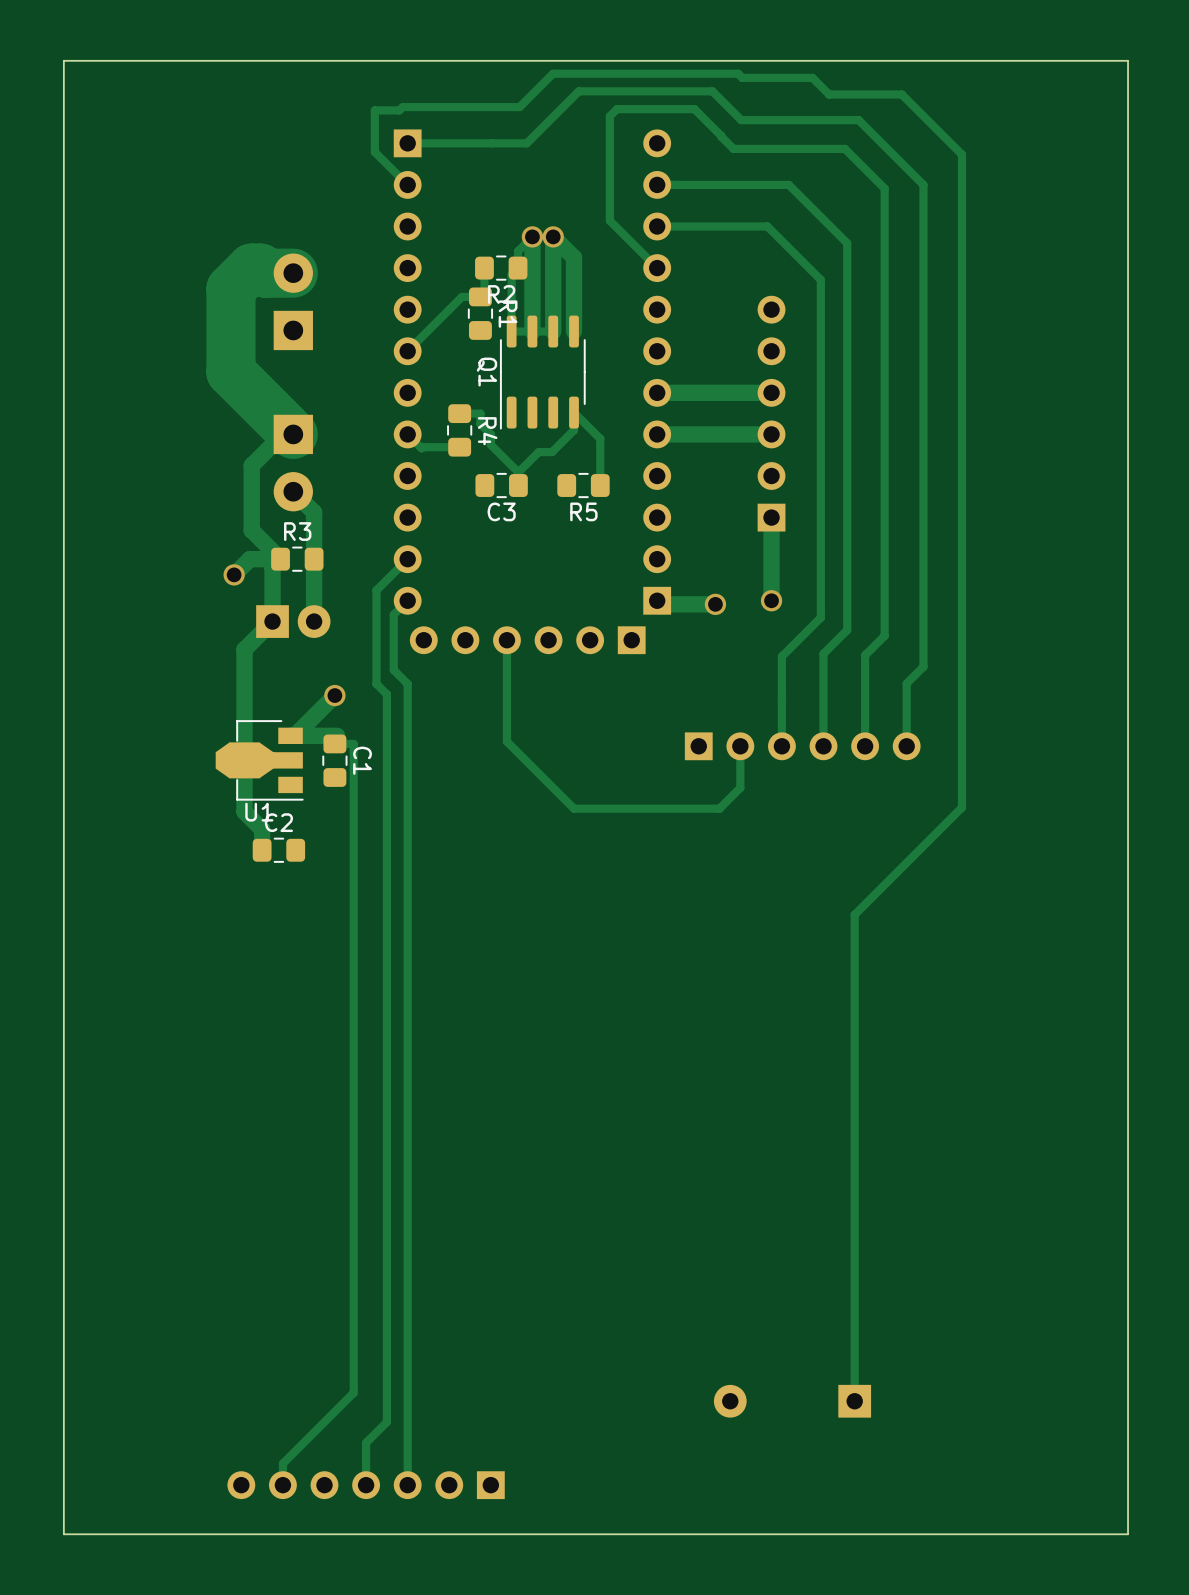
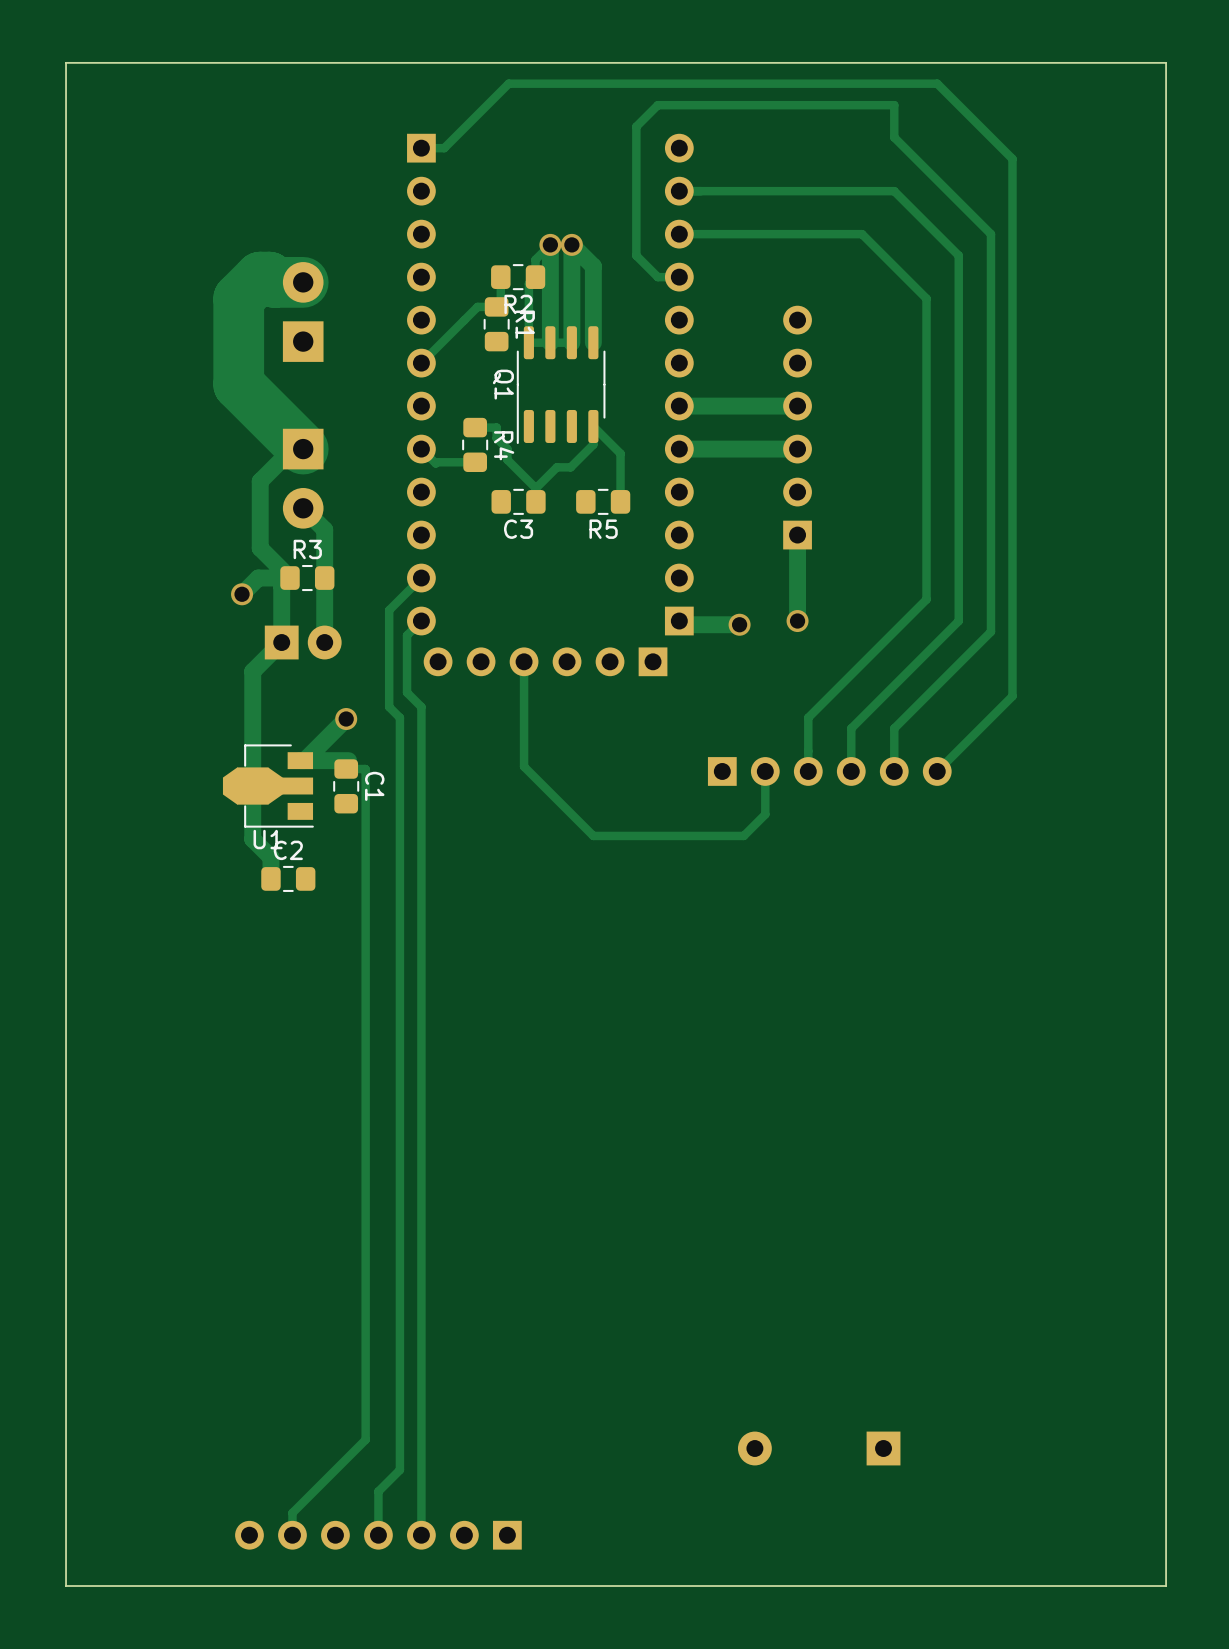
track: (429, 143) (526, 143) (578, 91) (712, 91) (741, 120) (858, 120) (923, 184) (923, 666) (906, 683) (906, 746) -> (444, 148) (508, 83) (937, 83) (1012, 158) (1012, 696) (937, 771)
track: (407, 184) (374, 152) (374, 110) (399, 110) (402, 107) (519, 107) (553, 73) (738, 73) (742, 77) (812, 77) (829, 94) (901, 94) (961, 154) (961, 807) (854, 914) (854, 1401) -> none
track: (788, 184) (847, 243) (847, 630) (823, 653) (823, 704) -> (815, 191) (894, 191) (958, 255) (958, 621) (851, 728)
track: (767, 226) (820, 279) (820, 617) (781, 656) (781, 694) -> (793, 234) (862, 234) (926, 298) (926, 599) (808, 717)
track: (657, 268) (609, 220) (609, 116) (616, 109) (694, 109) (733, 148) (844, 148) (884, 188) (884, 635) (865, 655) (865, 704) -> (679, 277) (657, 277) (636, 255) (636, 126) (657, 105) (894, 105) (894, 137) (990, 234) (990, 631) (894, 728)

